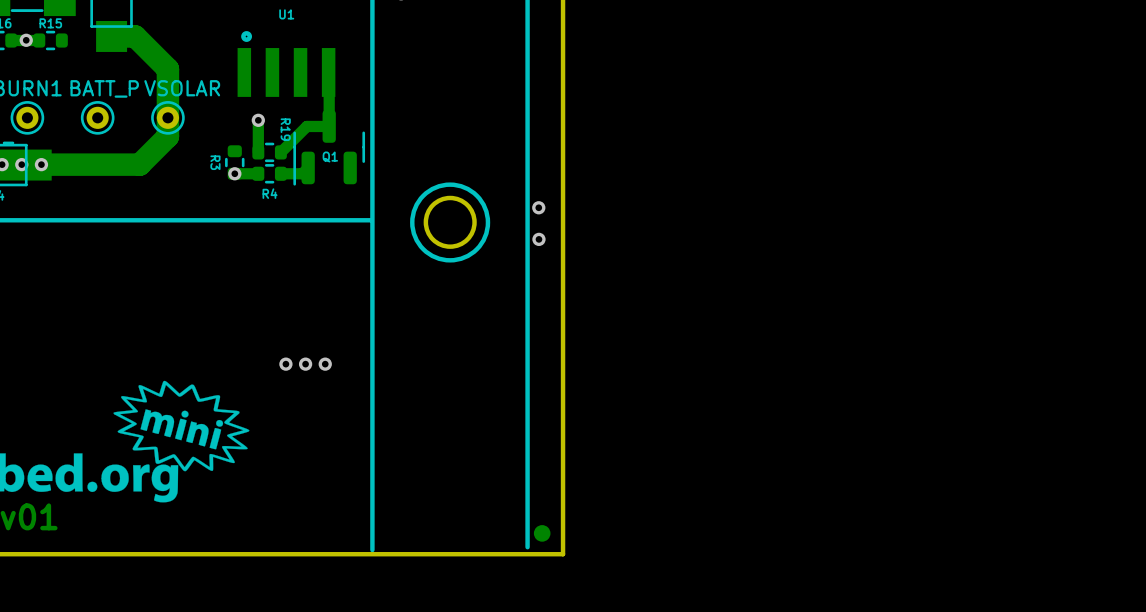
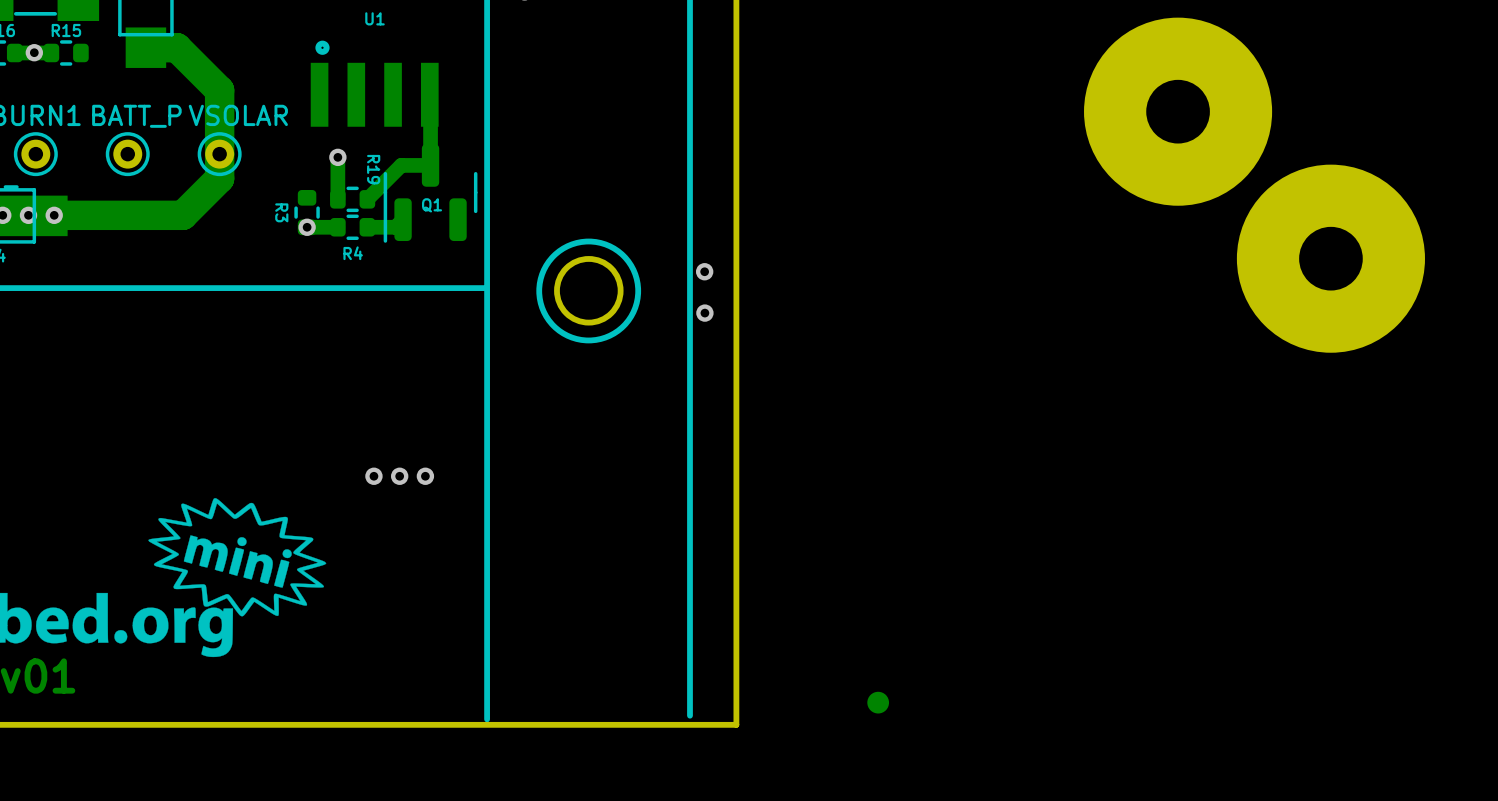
part: none -> (1178, 111)
part: none -> (1330, 258)
part position: (542, 533) -> (878, 702)

